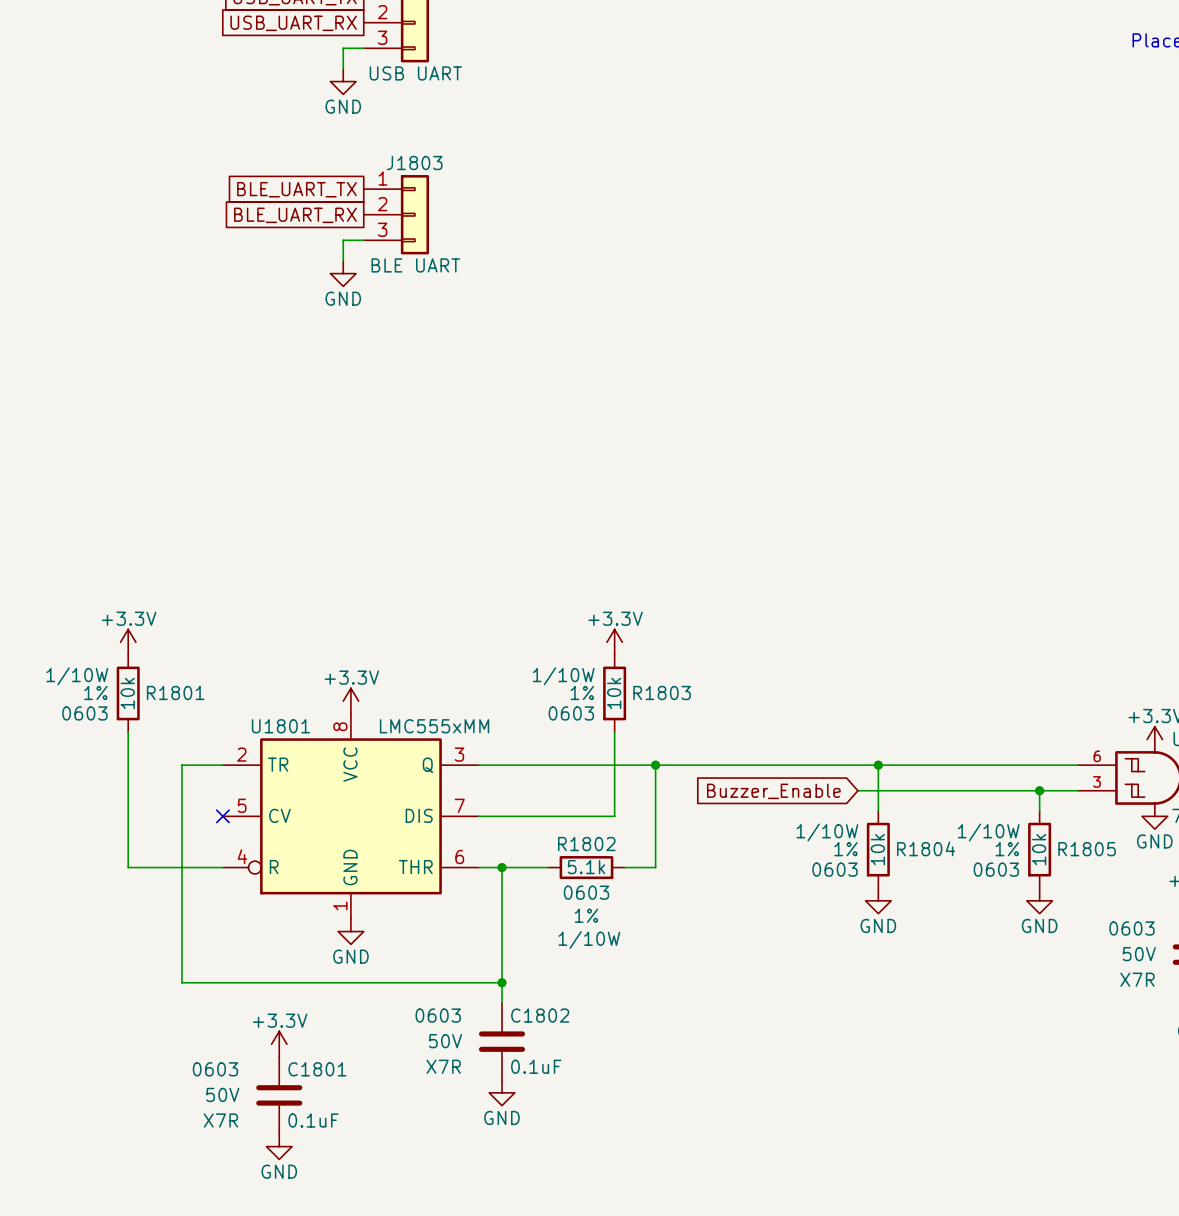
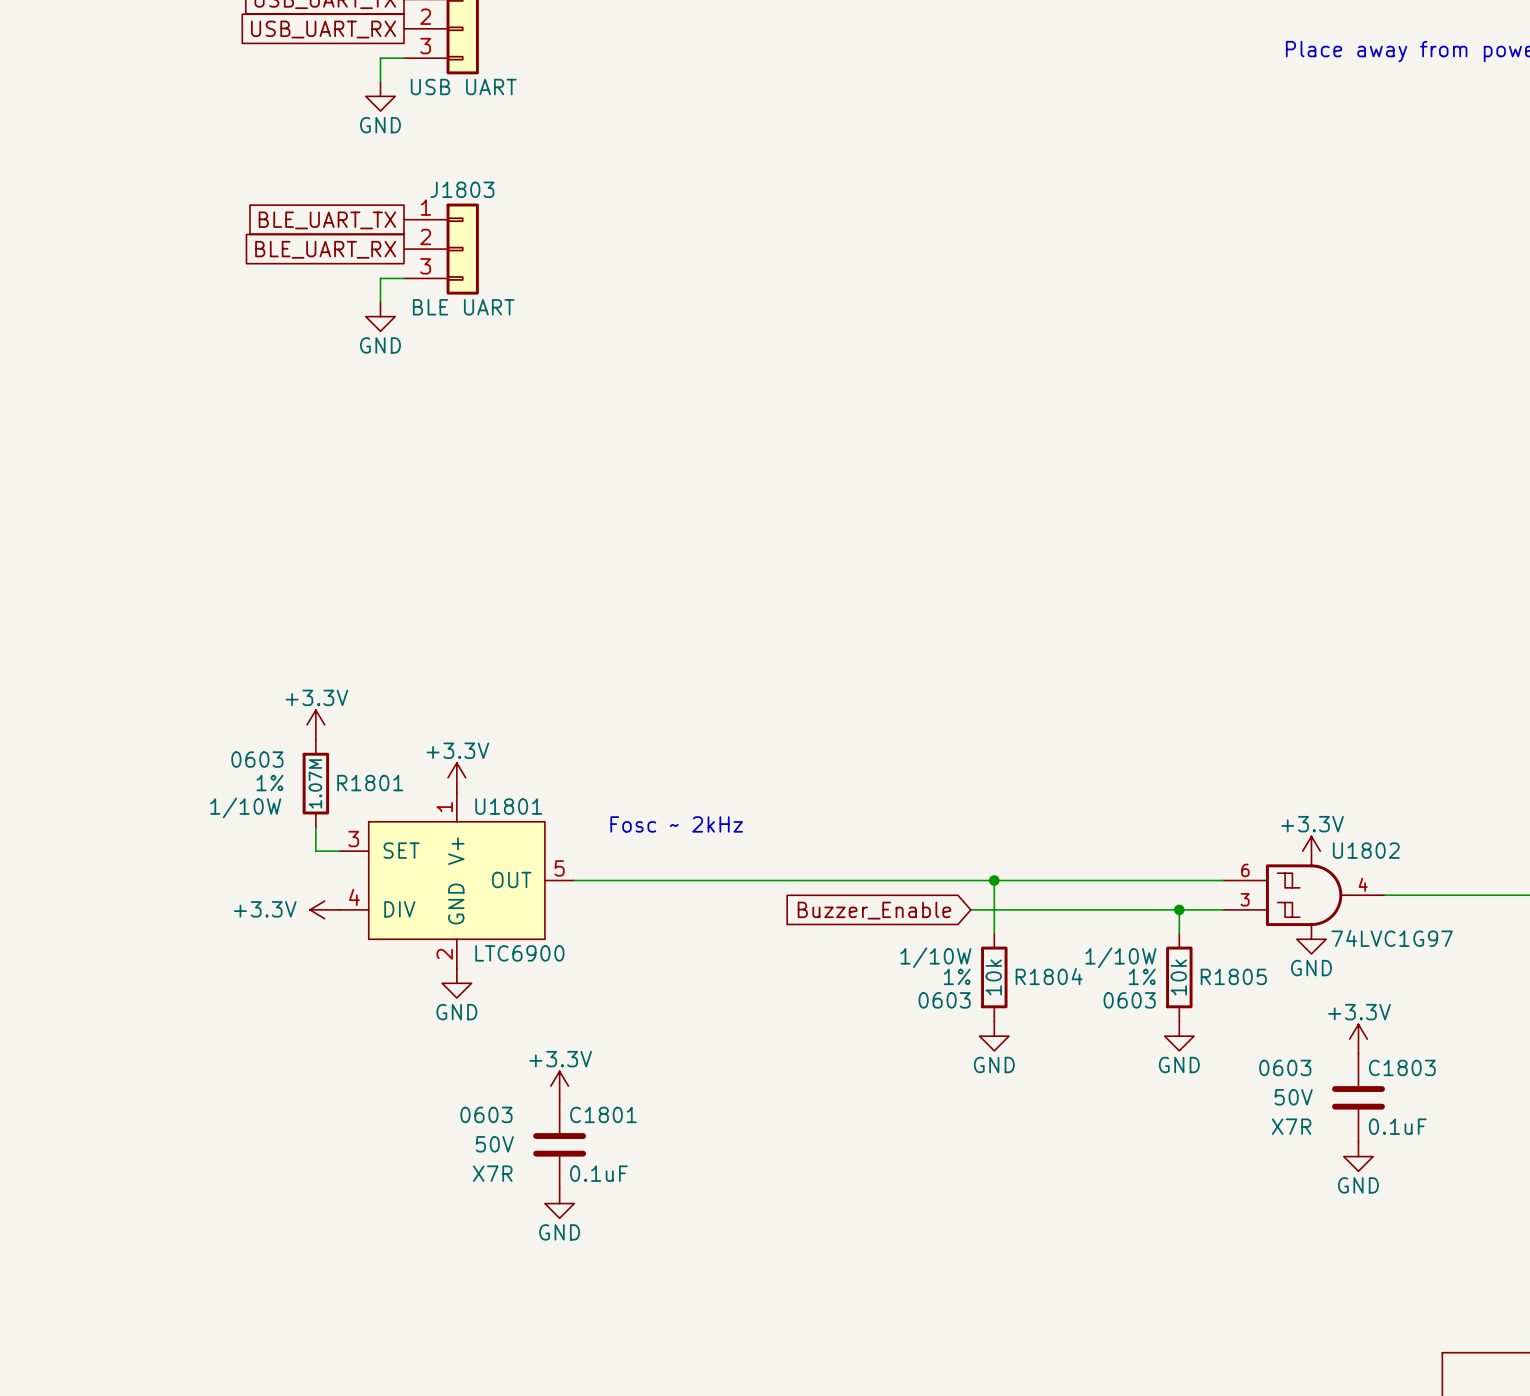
power symbol: none -> +3.3V (315, 724)
power symbol: +3.3V (128, 642) -> none
power symbol: +3.3V (614, 642) -> none
power symbol: none -> +3.3V (456, 777)
R1801 text position: 1/10W (77, 676) -> 1/10W (245, 807)
R1801 text position: 1% (95, 692) -> 1% (269, 783)
R1801 value: 10k (127, 693) -> 1.07M (315, 783)
R1801 position: (128, 693) -> (315, 783)
R1803: 10k (614, 693) -> none
power symbol: +3.3V (350, 701) -> none
R1801 text position: 0603 (84, 713) -> 0603 (257, 759)
U1801 symbol: [222, 713, 479, 919] -> [339, 792, 575, 969]
text: none -> Fosc ~ 2kHz (676, 824)
U1801 name position: U1801 (280, 726) -> U1801 (508, 806)
U1801 value: LMC555xMM (434, 726) -> LTC6900 (519, 953)
wire: (128, 731) (128, 867) (222, 867) -> none
wire: (614, 731) (614, 816) (478, 816) -> none
wire: (222, 765) (181, 765) (181, 982) (501, 982) -> none
wire: (655, 765) (655, 867) (624, 867) -> none
junction: (655, 765) -> none
power symbol: none -> +3.3V (324, 909)
no-connect mark: (222, 816) -> none
power symbol: none -> GND (456, 983)
wire: (478, 867) (548, 867) -> none
wire: (501, 867) (501, 1003) -> none
junction: (501, 867) -> none
R1802: 5.1k (586, 867) -> none
power symbol: GND (350, 931) -> none
power symbol: none -> +3.3V (559, 1086)
junction: (501, 982) -> none
C1802: 0.1uF (501, 1041) -> none
power symbol: +3.3V (279, 1044) -> none
power symbol position: GND (501, 1092) -> GND (559, 1203)
C1801 position: (279, 1095) -> (559, 1144)
power symbol: GND (279, 1146) -> none

